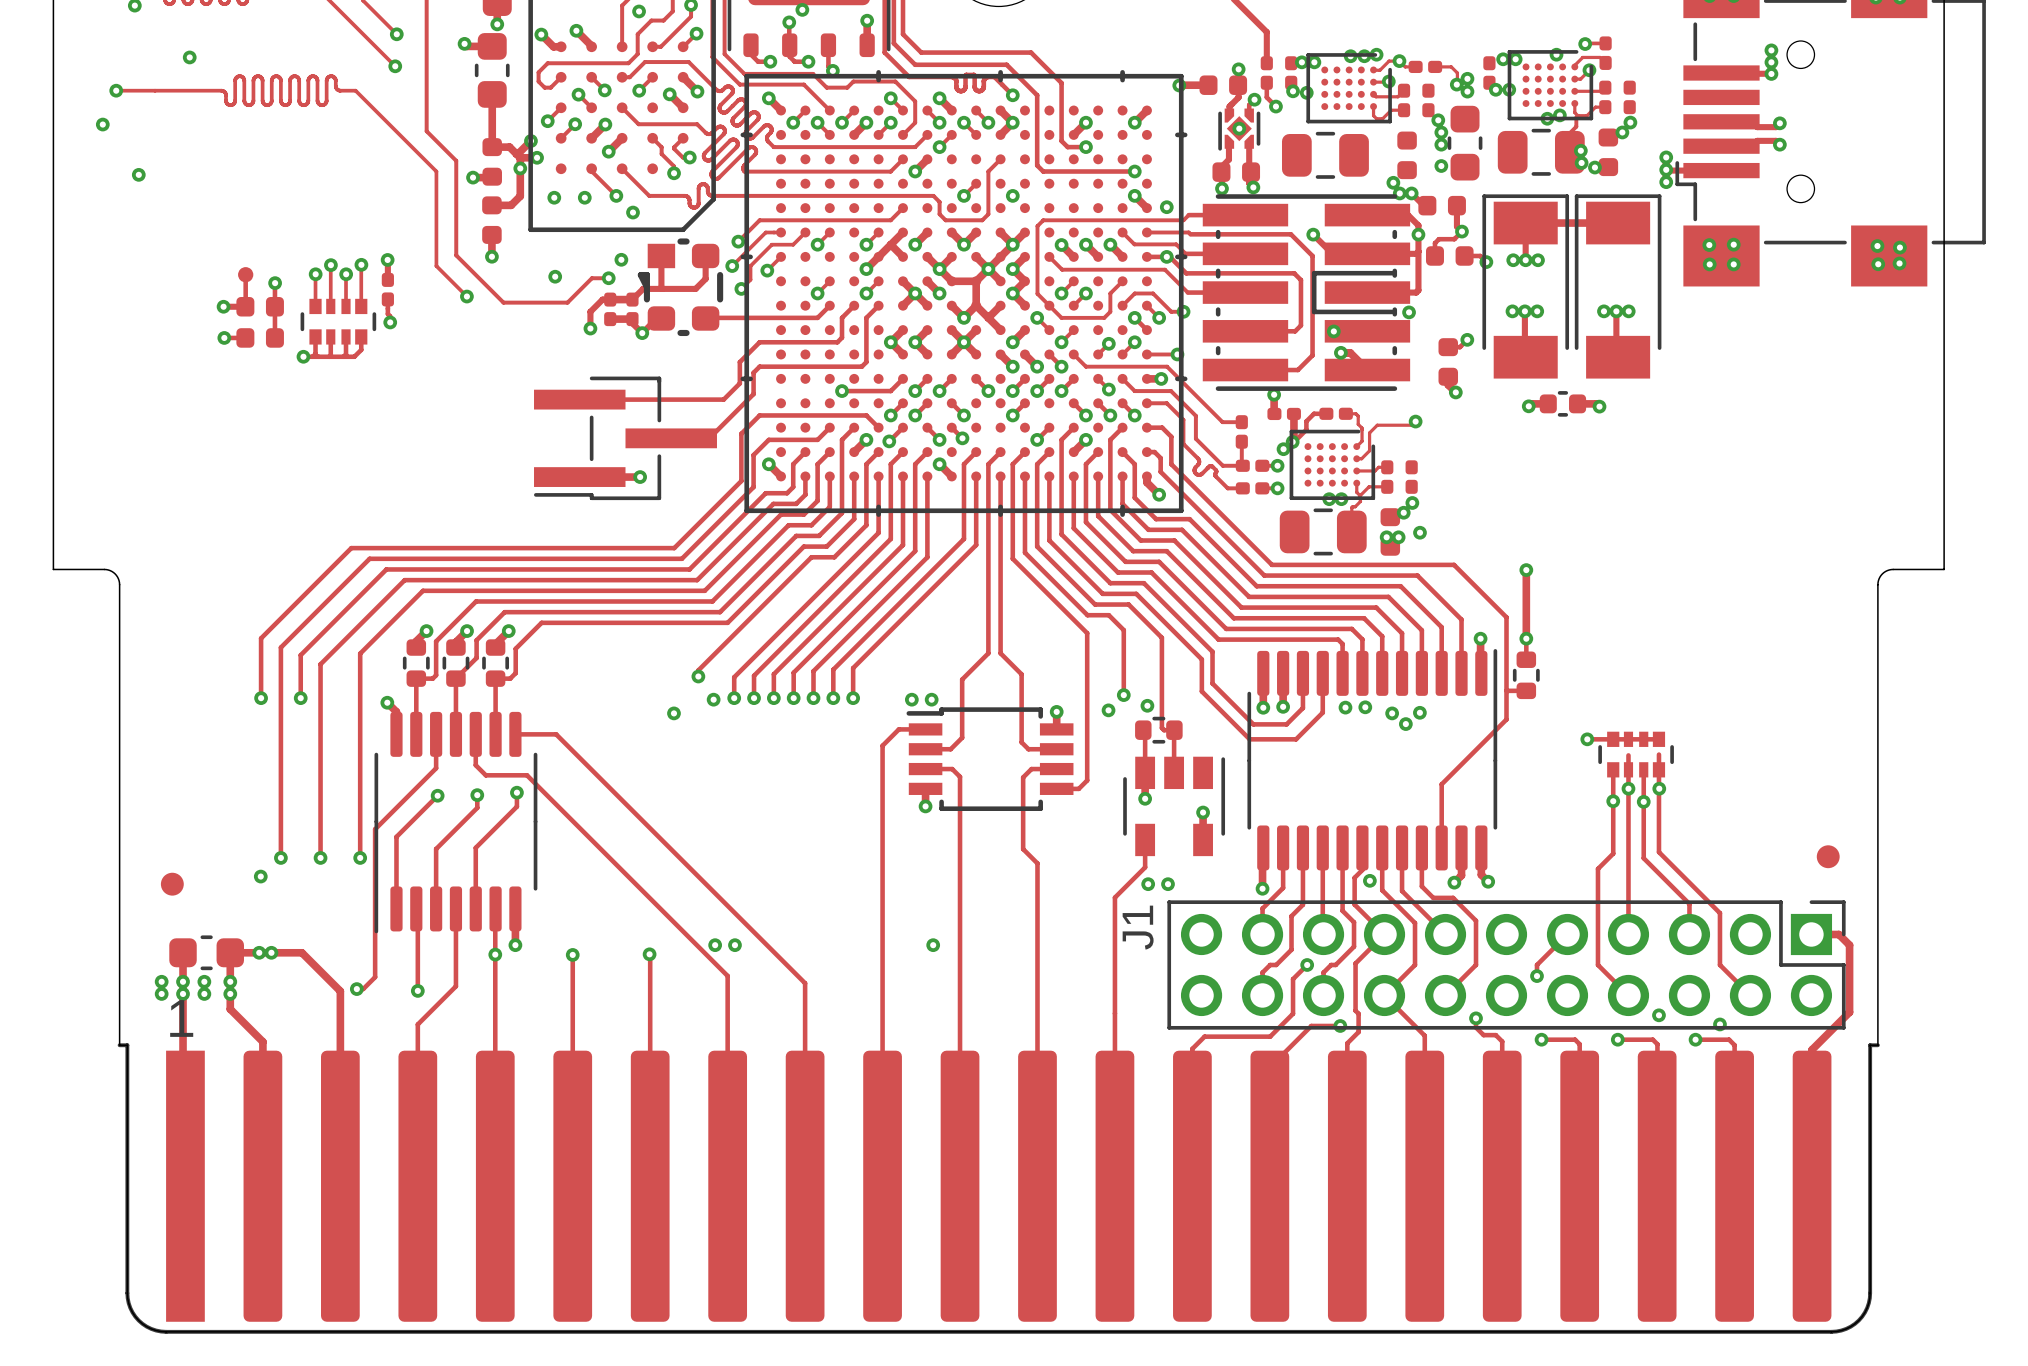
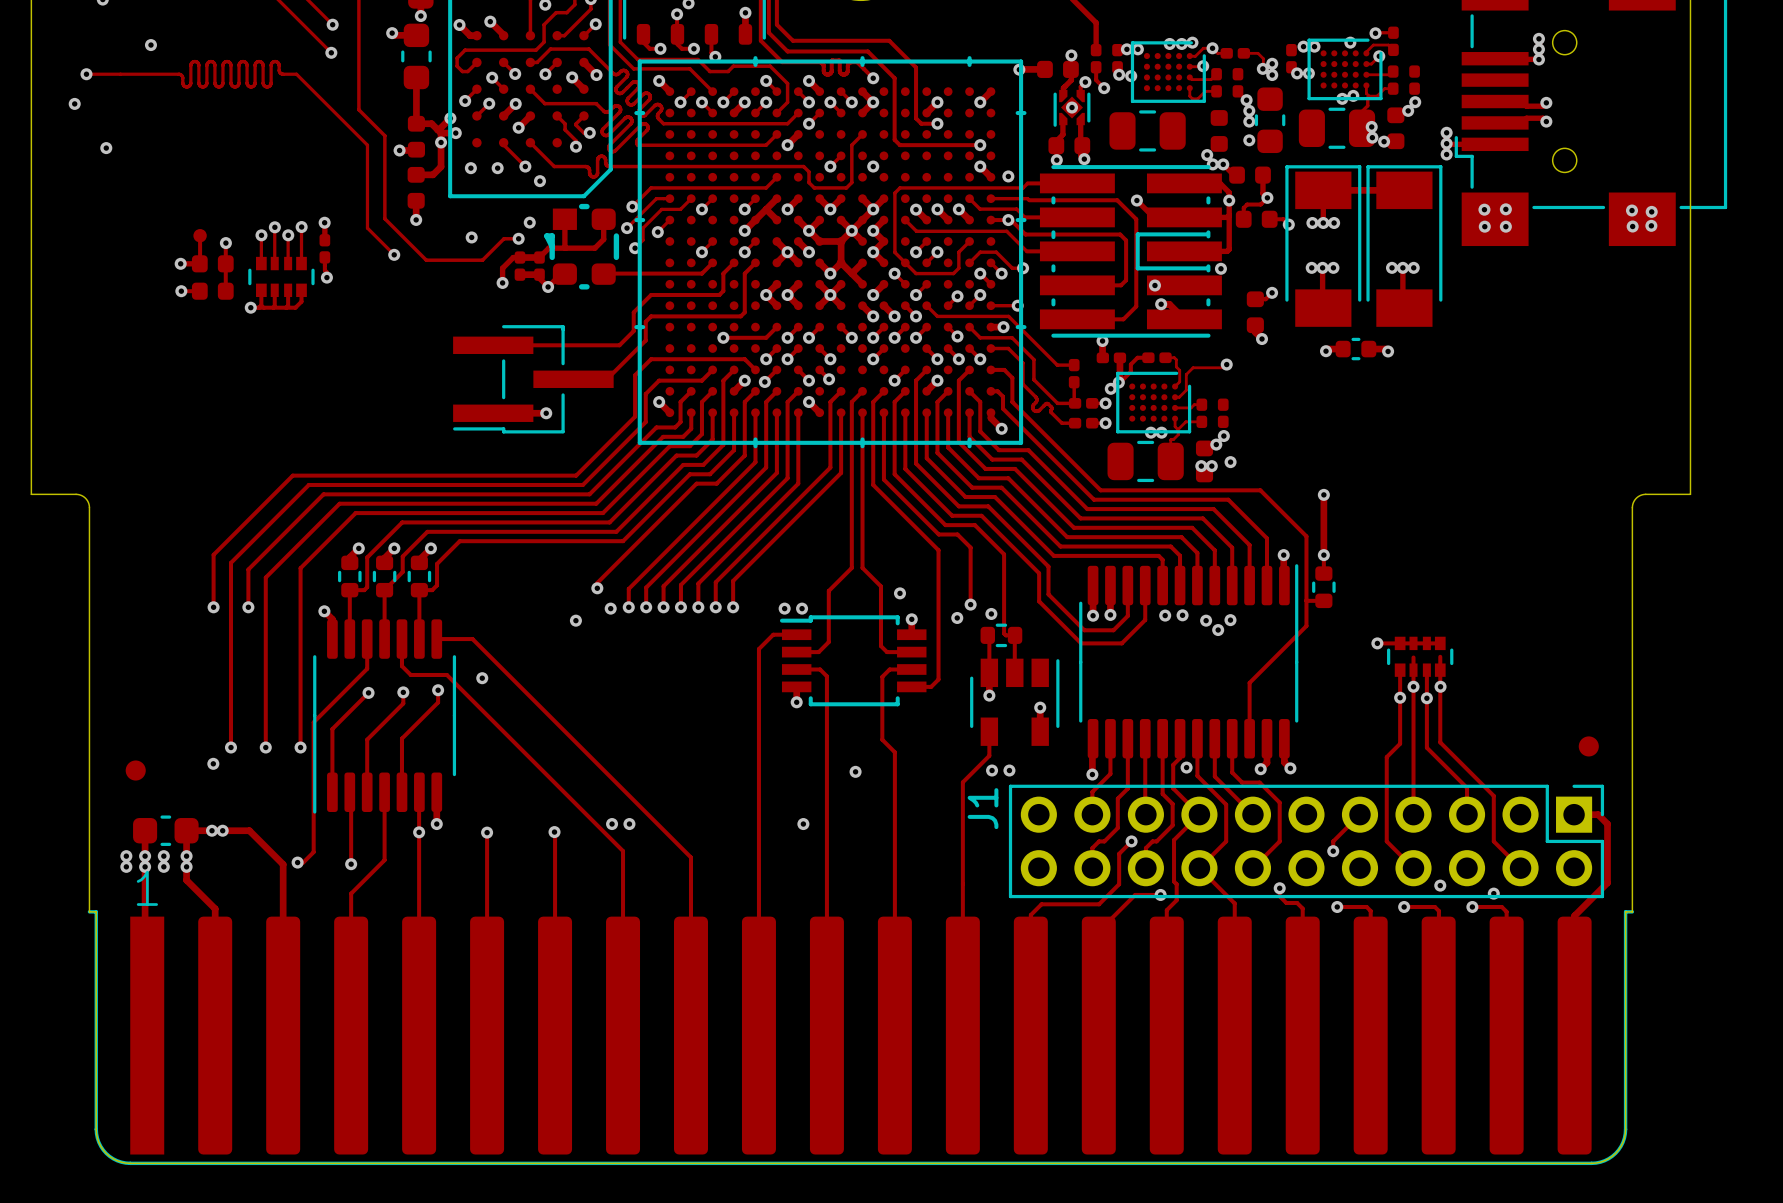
via: none -> (899, 593)
via: none -> (482, 678)
via: none -> (855, 771)

